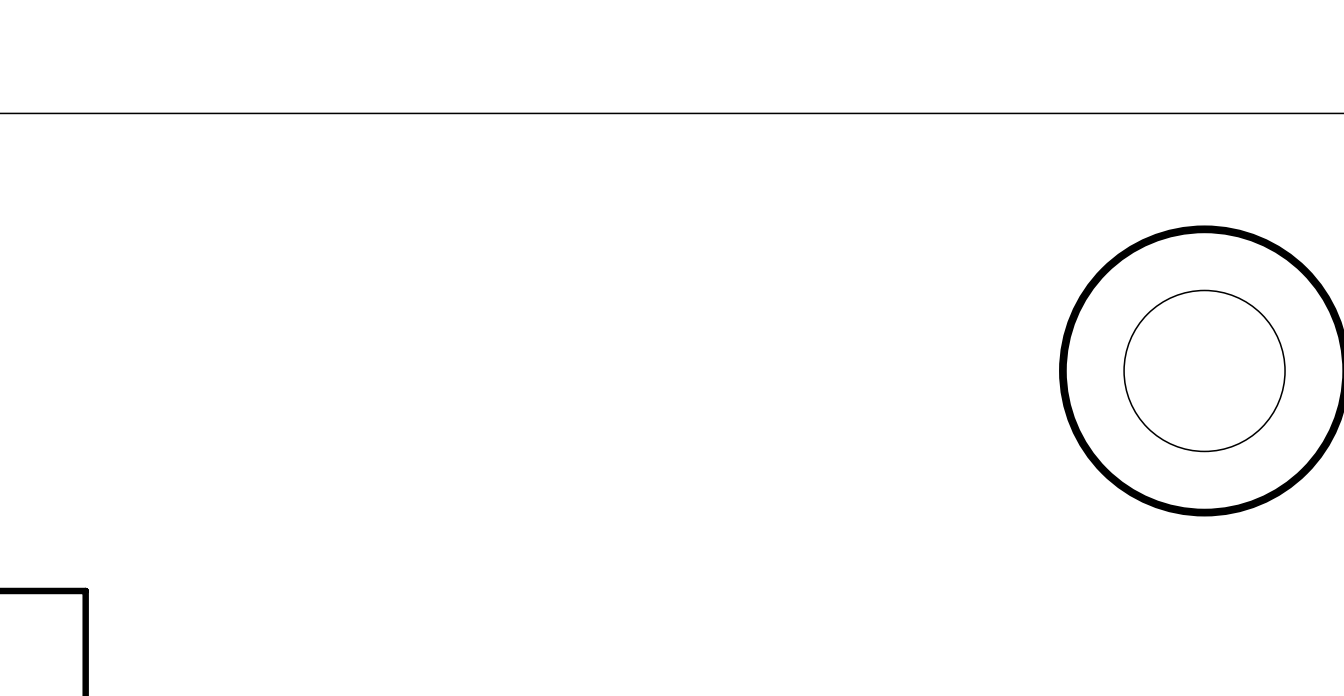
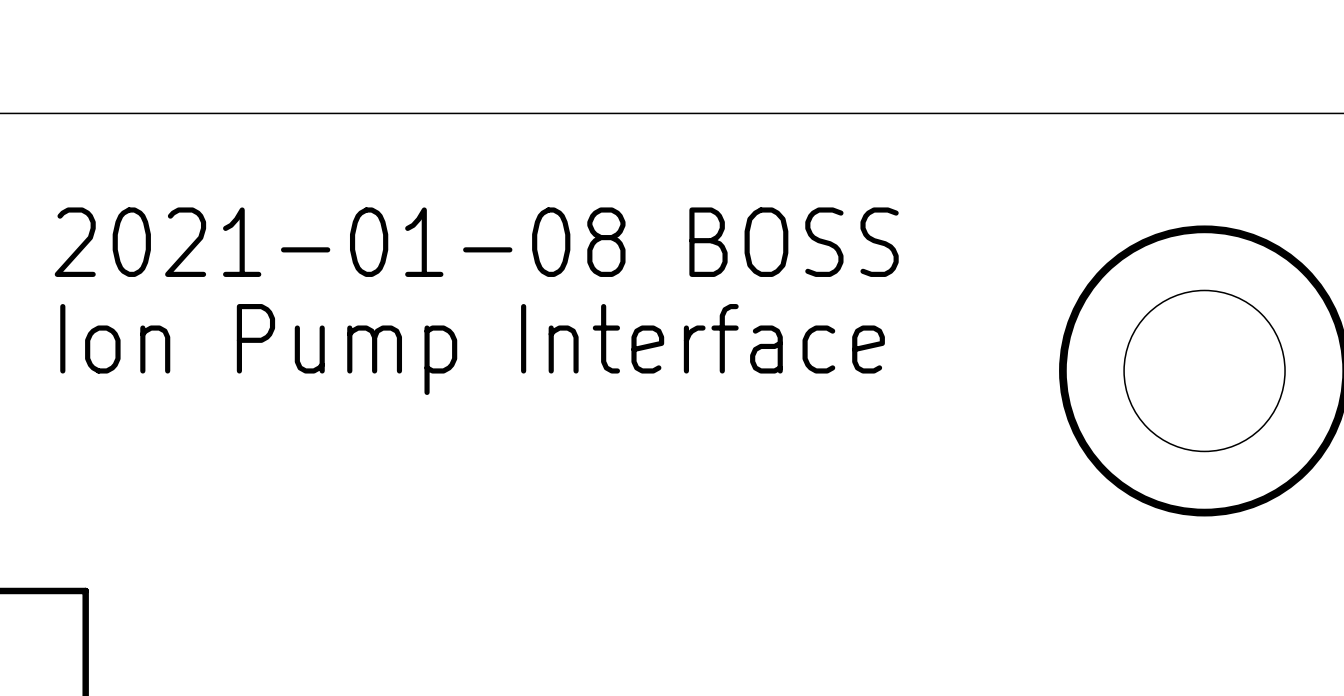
text: none -> 2021-01-08 BOSS (476, 242)
text: none -> Ion Pump Interface (472, 349)

